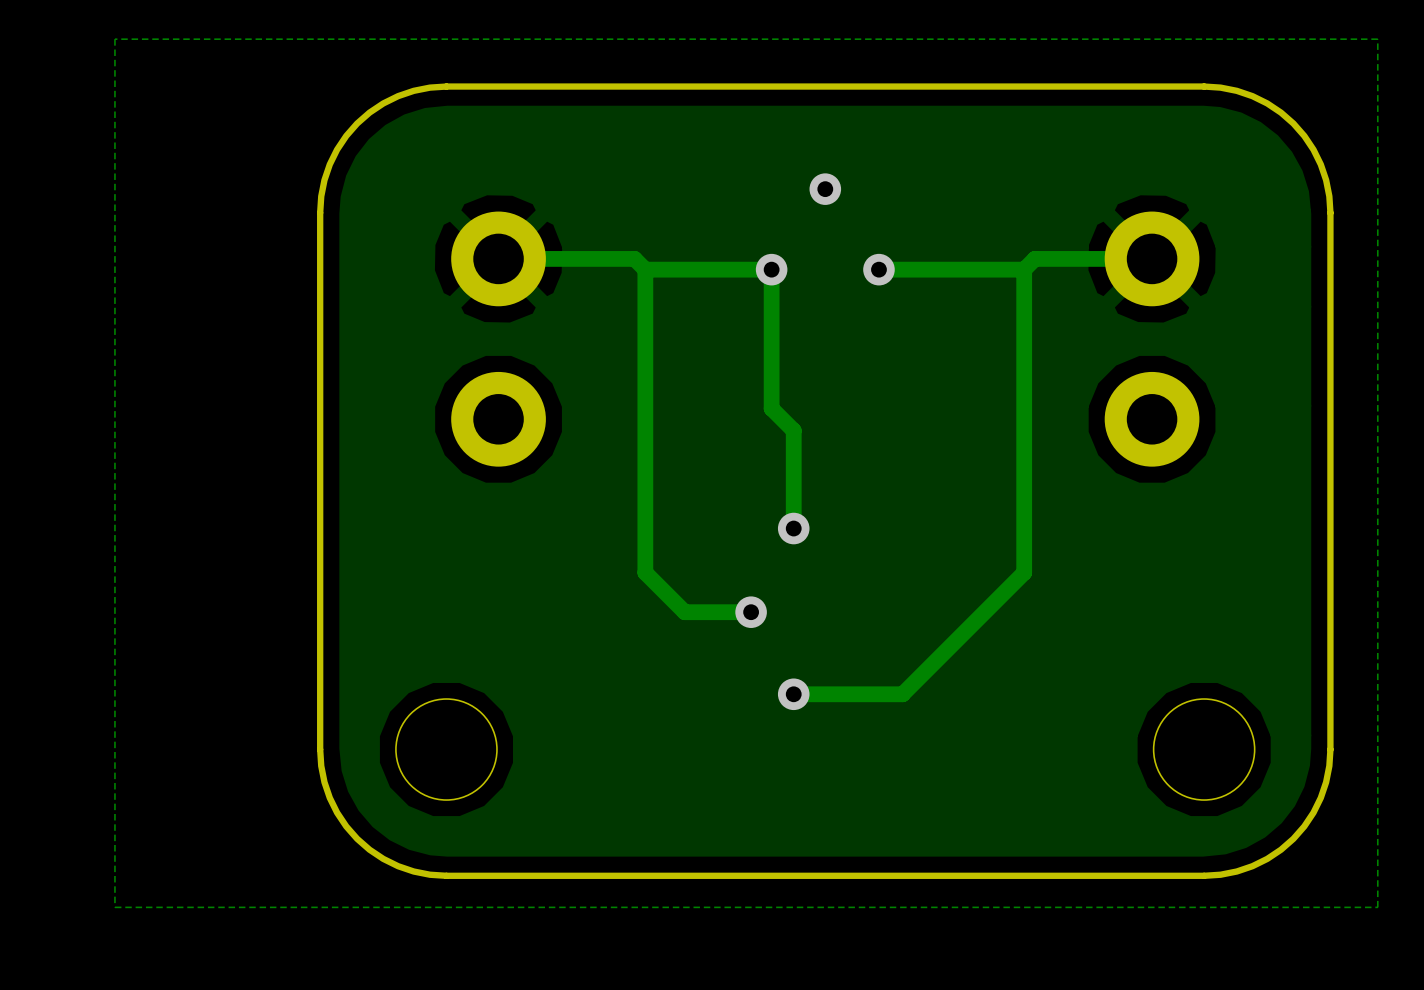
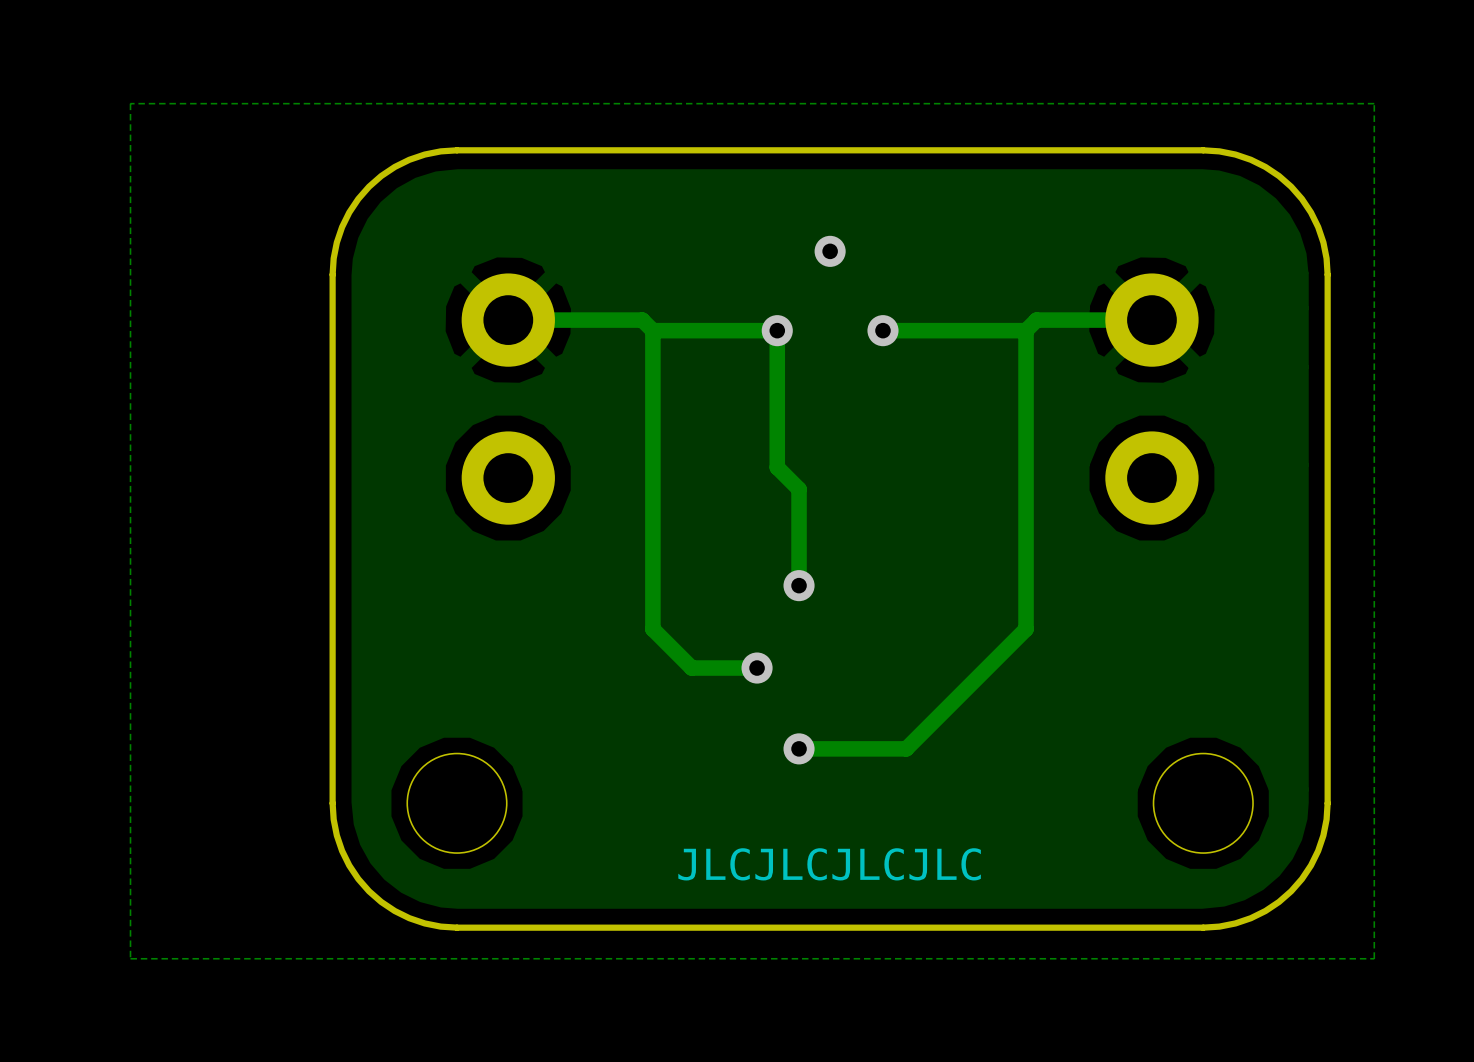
text: none -> JLCJLCJLCJLC (829, 864)

